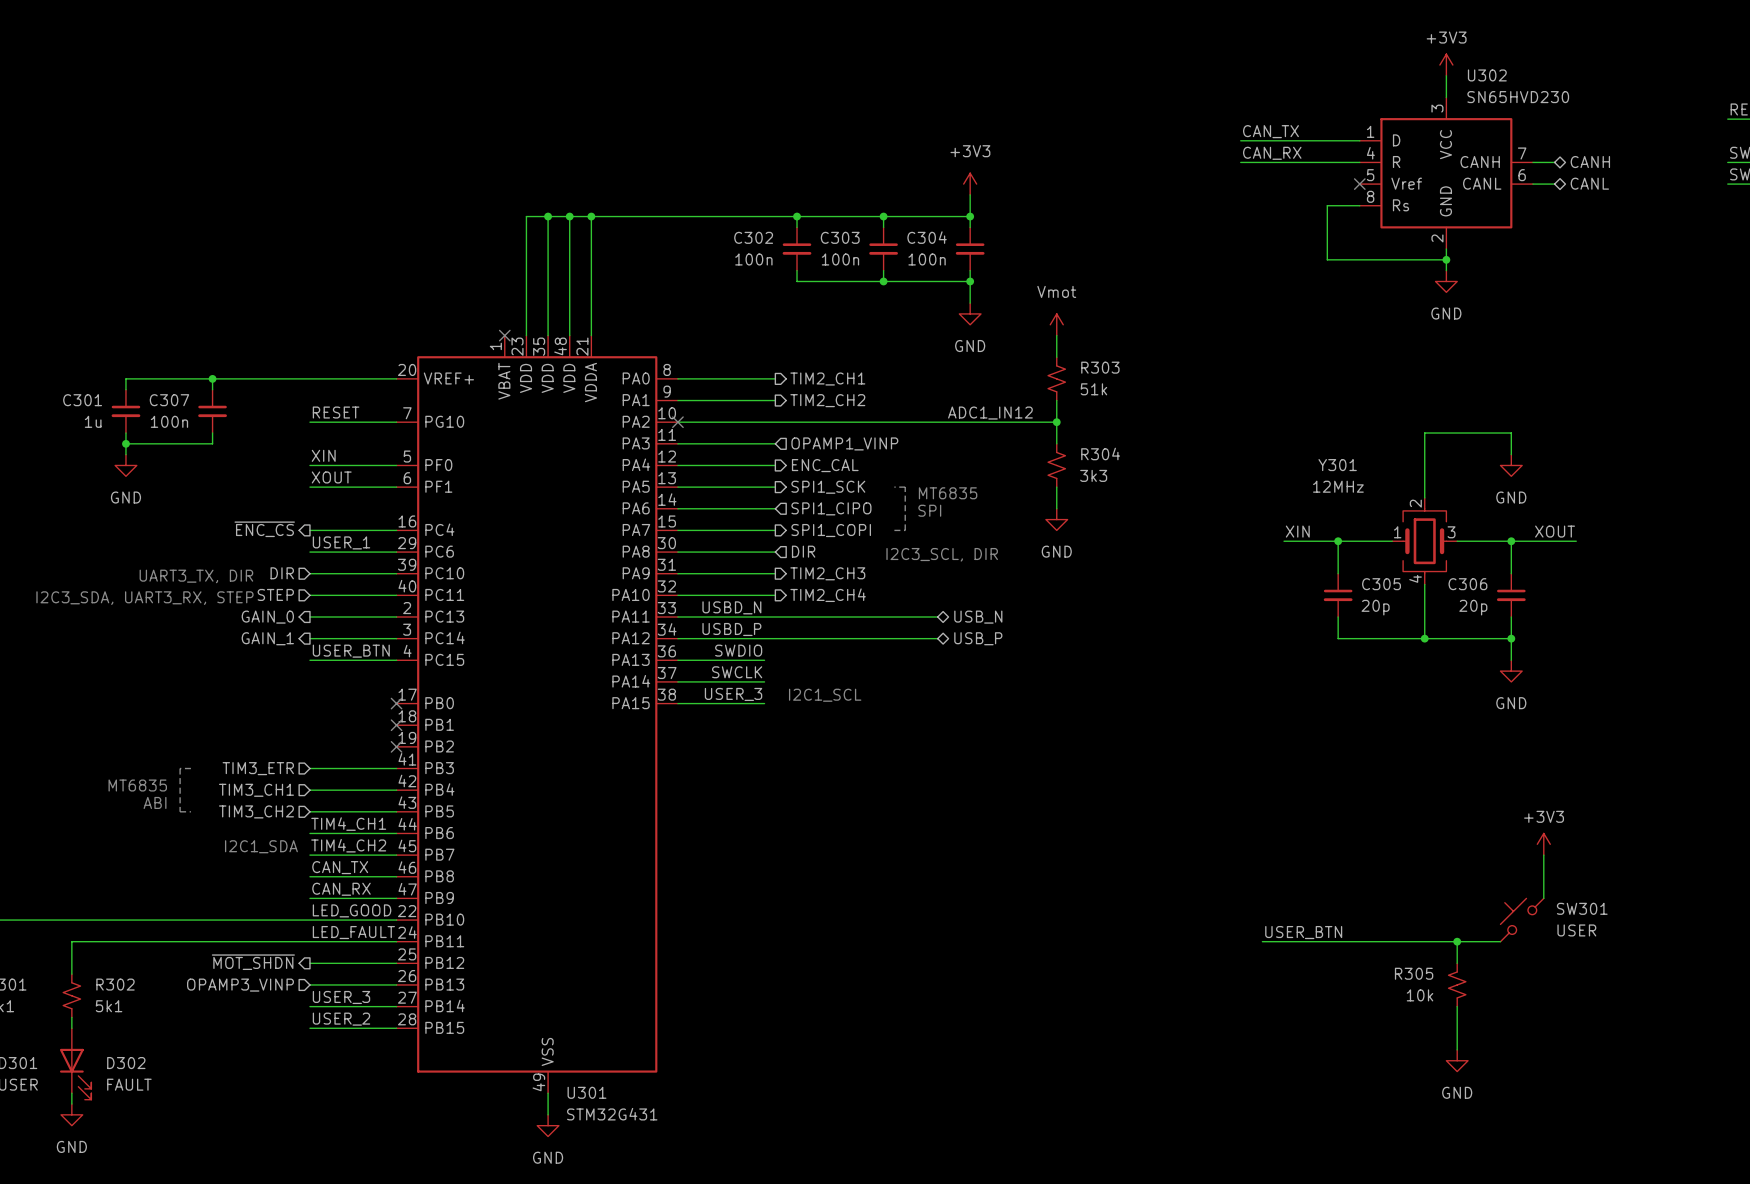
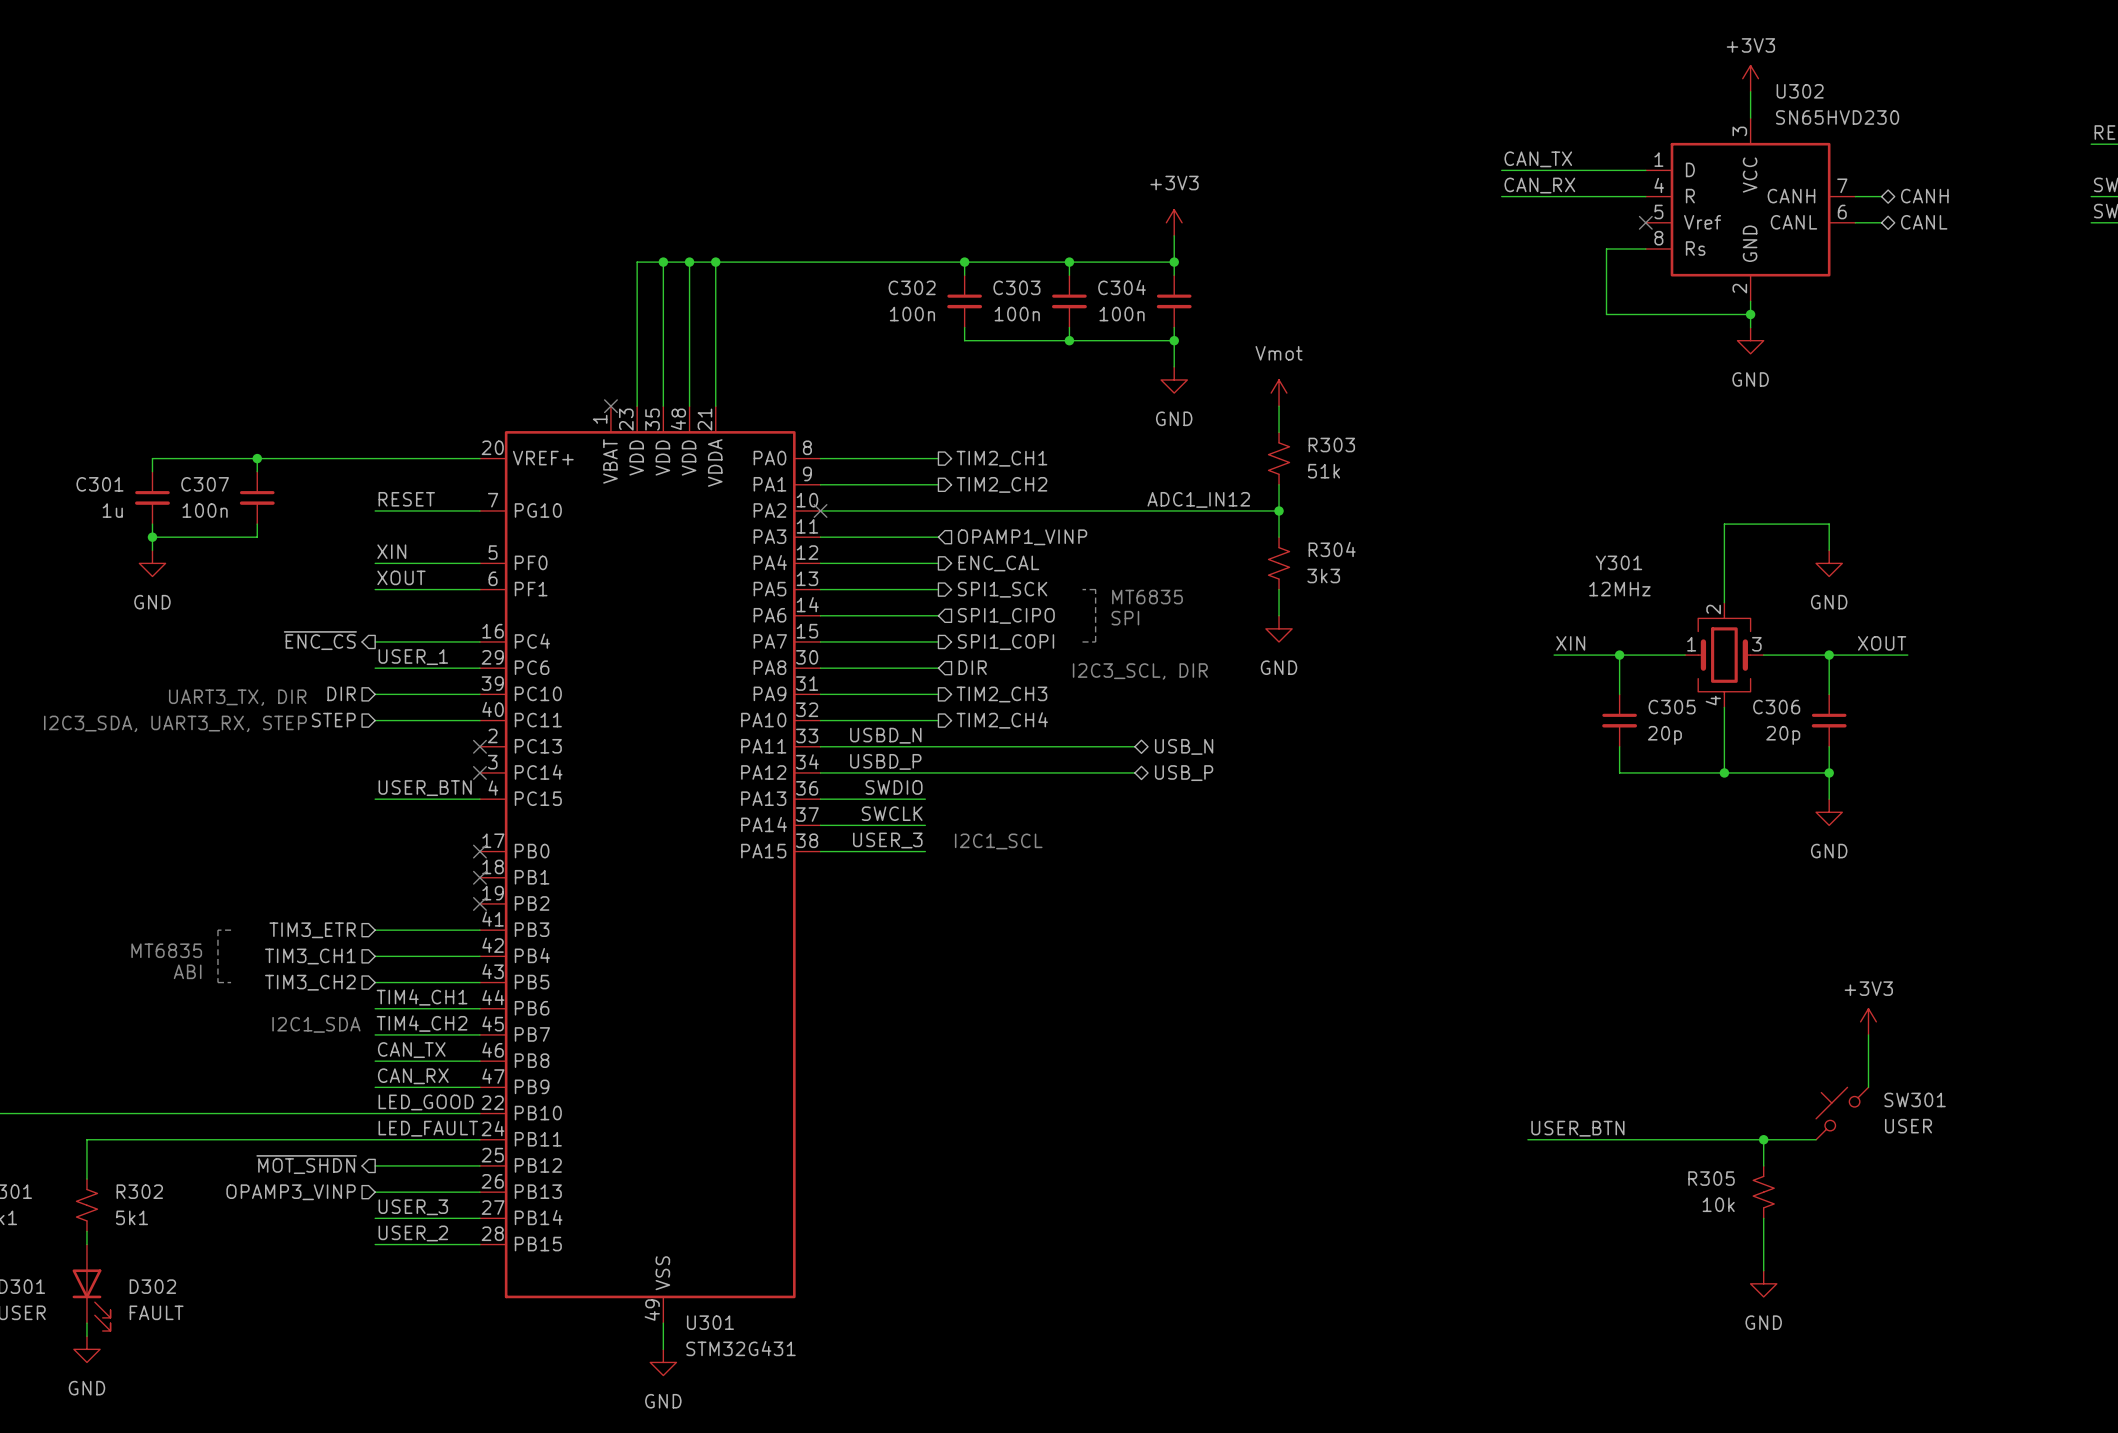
hierarchical label: GAIN_0 (267, 617) -> none
wire: (309, 617) (396, 617) -> none
no-connect mark: none -> (479, 746)
hierarchical label: GAIN_1 (267, 638) -> none
wire: (309, 638) (396, 638) -> none
no-connect mark: none -> (479, 772)

